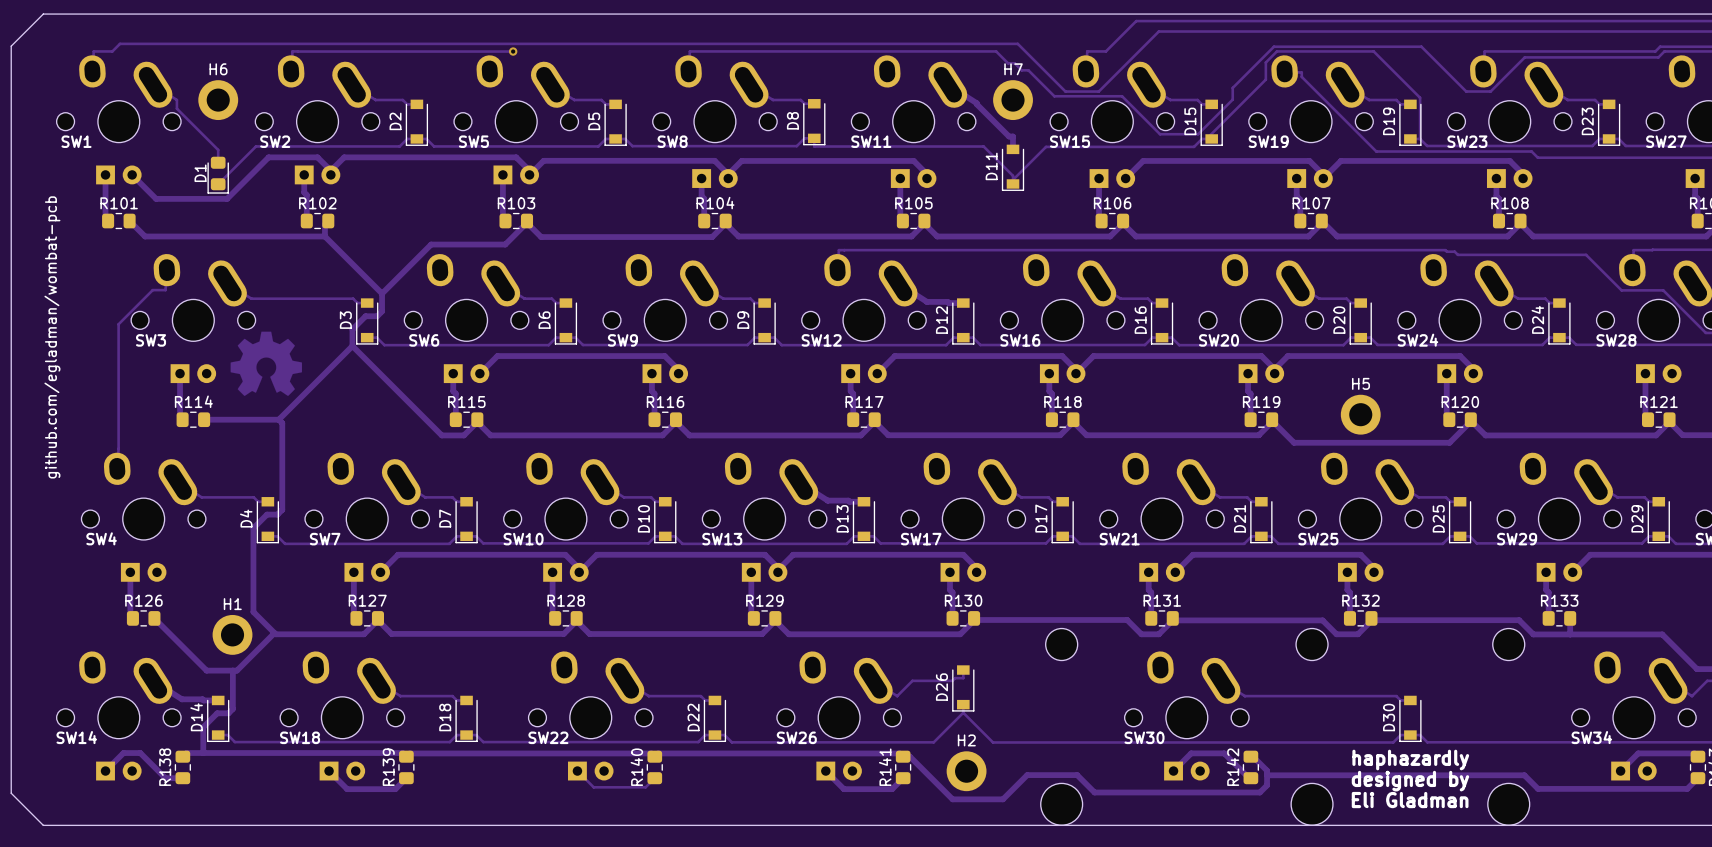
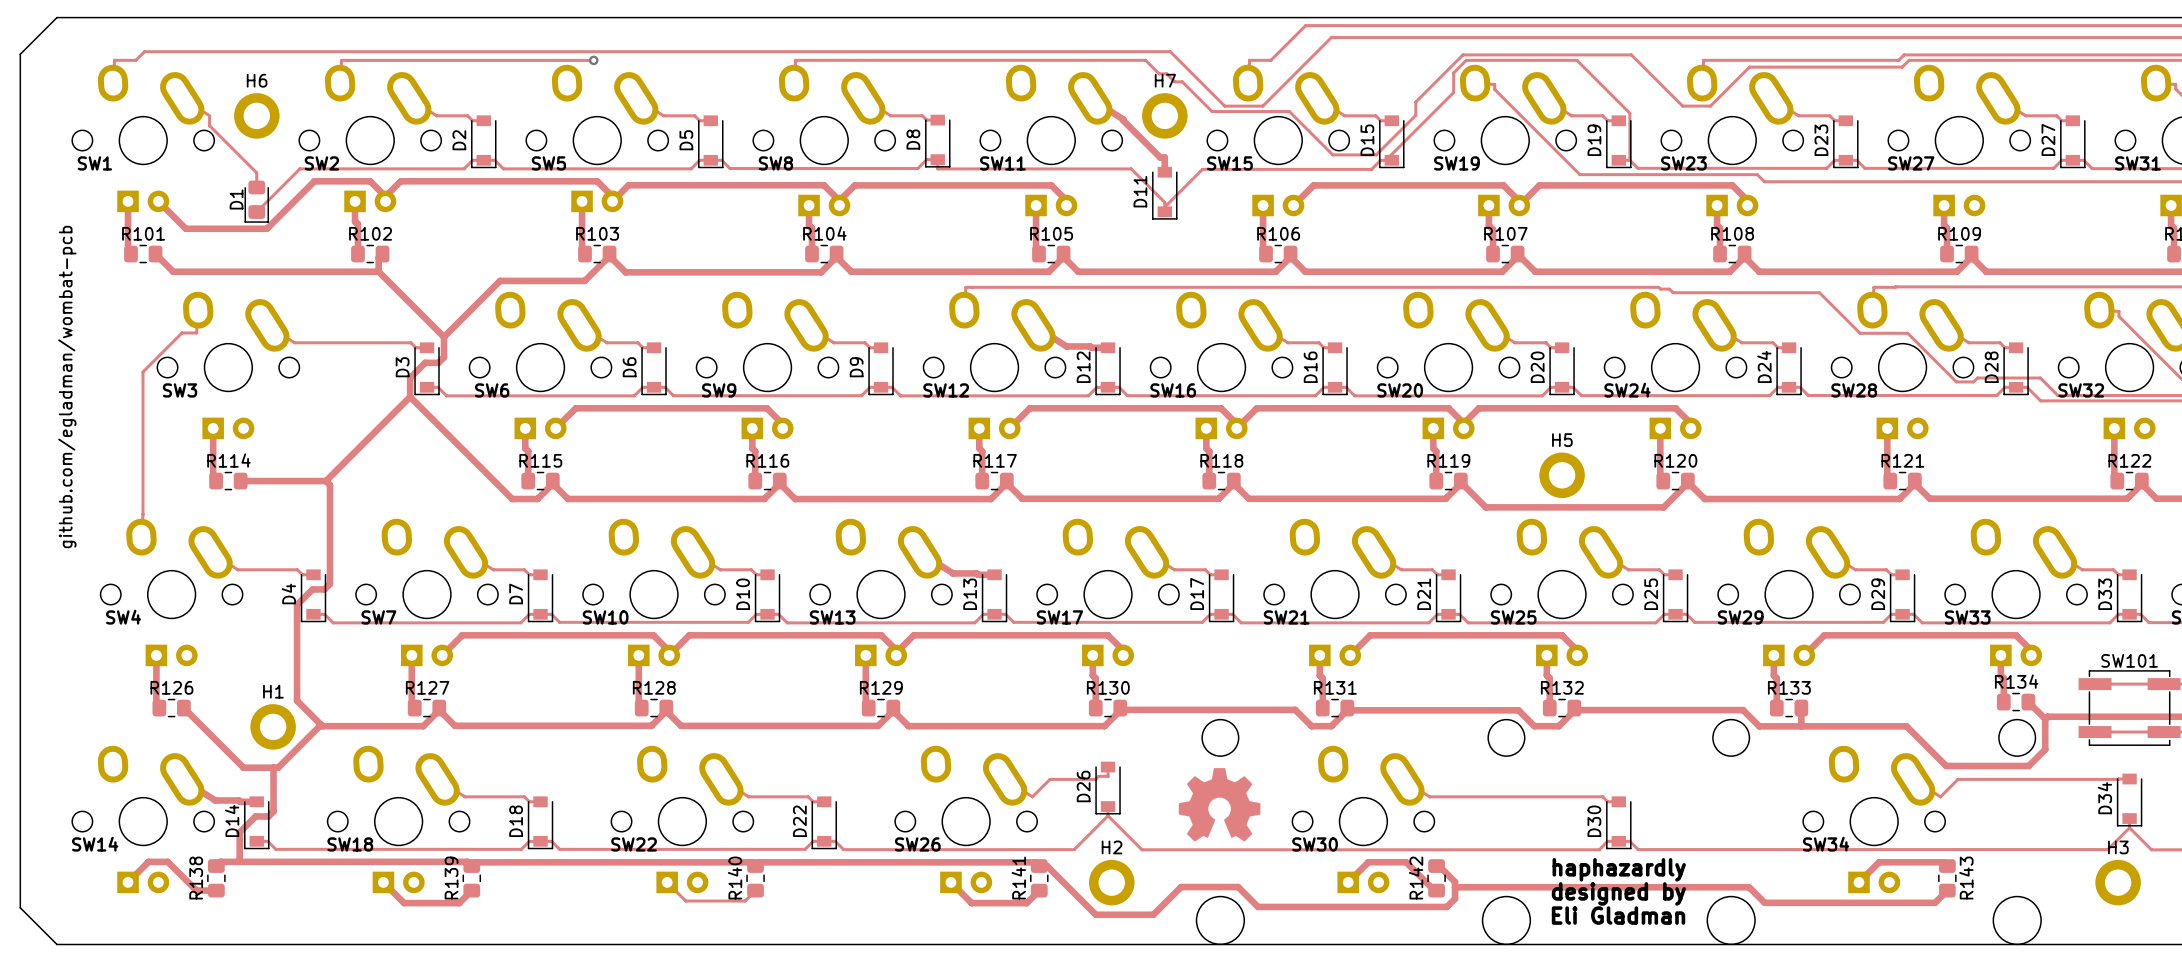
drawing: [230, 331, 303, 396] -> none
drawing: none -> [1178, 768, 1261, 842]

